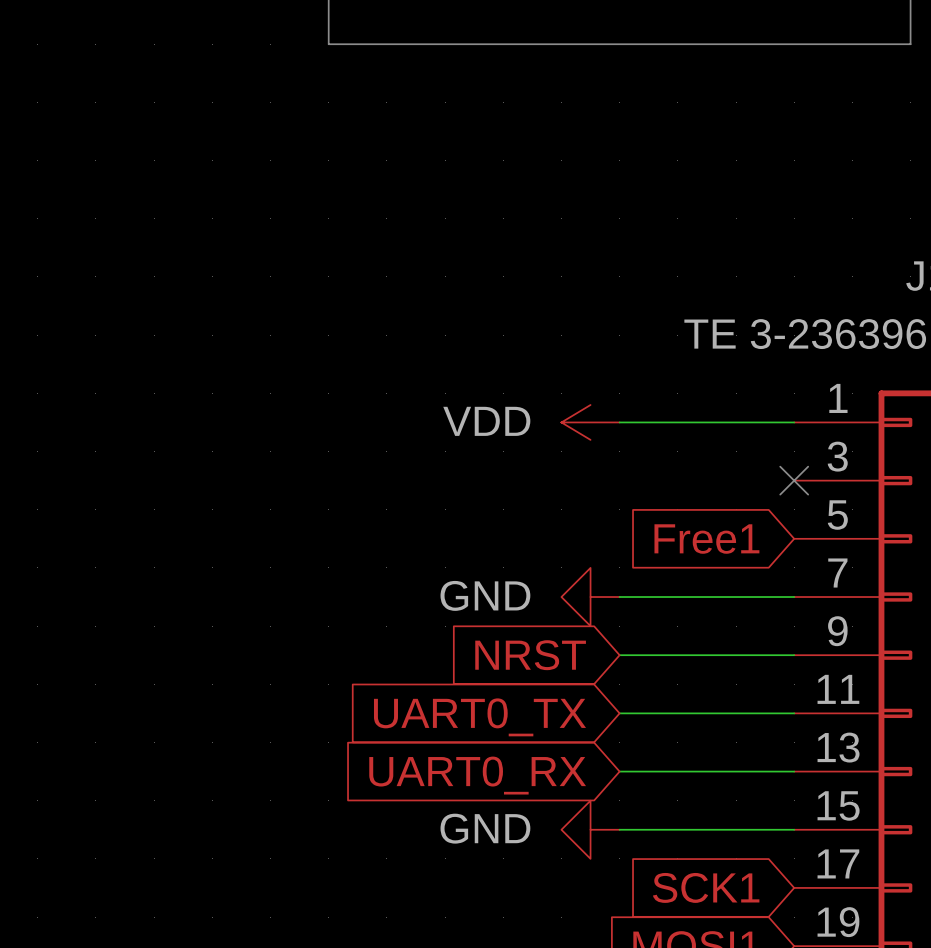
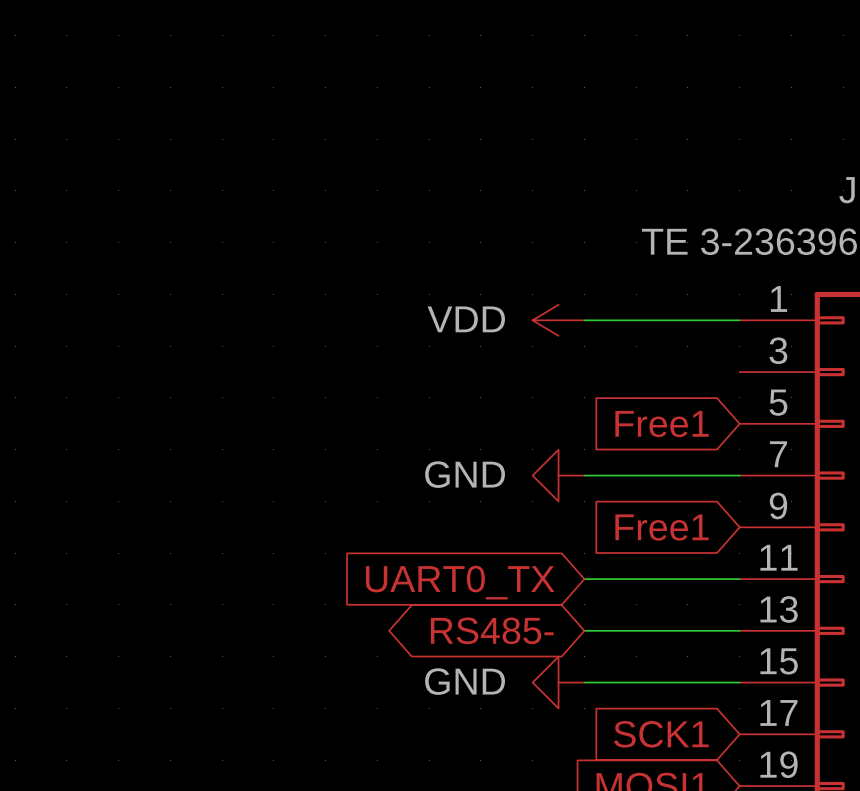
no-connect mark: (794, 480) -> none
global label: NRST (530, 655) -> none
wire: (619, 655) (794, 655) -> none
global label: none -> Free1 (662, 527)
global label shape: input (477, 775) -> bidirectional (492, 630)
global label: UART0_RX (477, 775) -> RS485- (492, 630)

